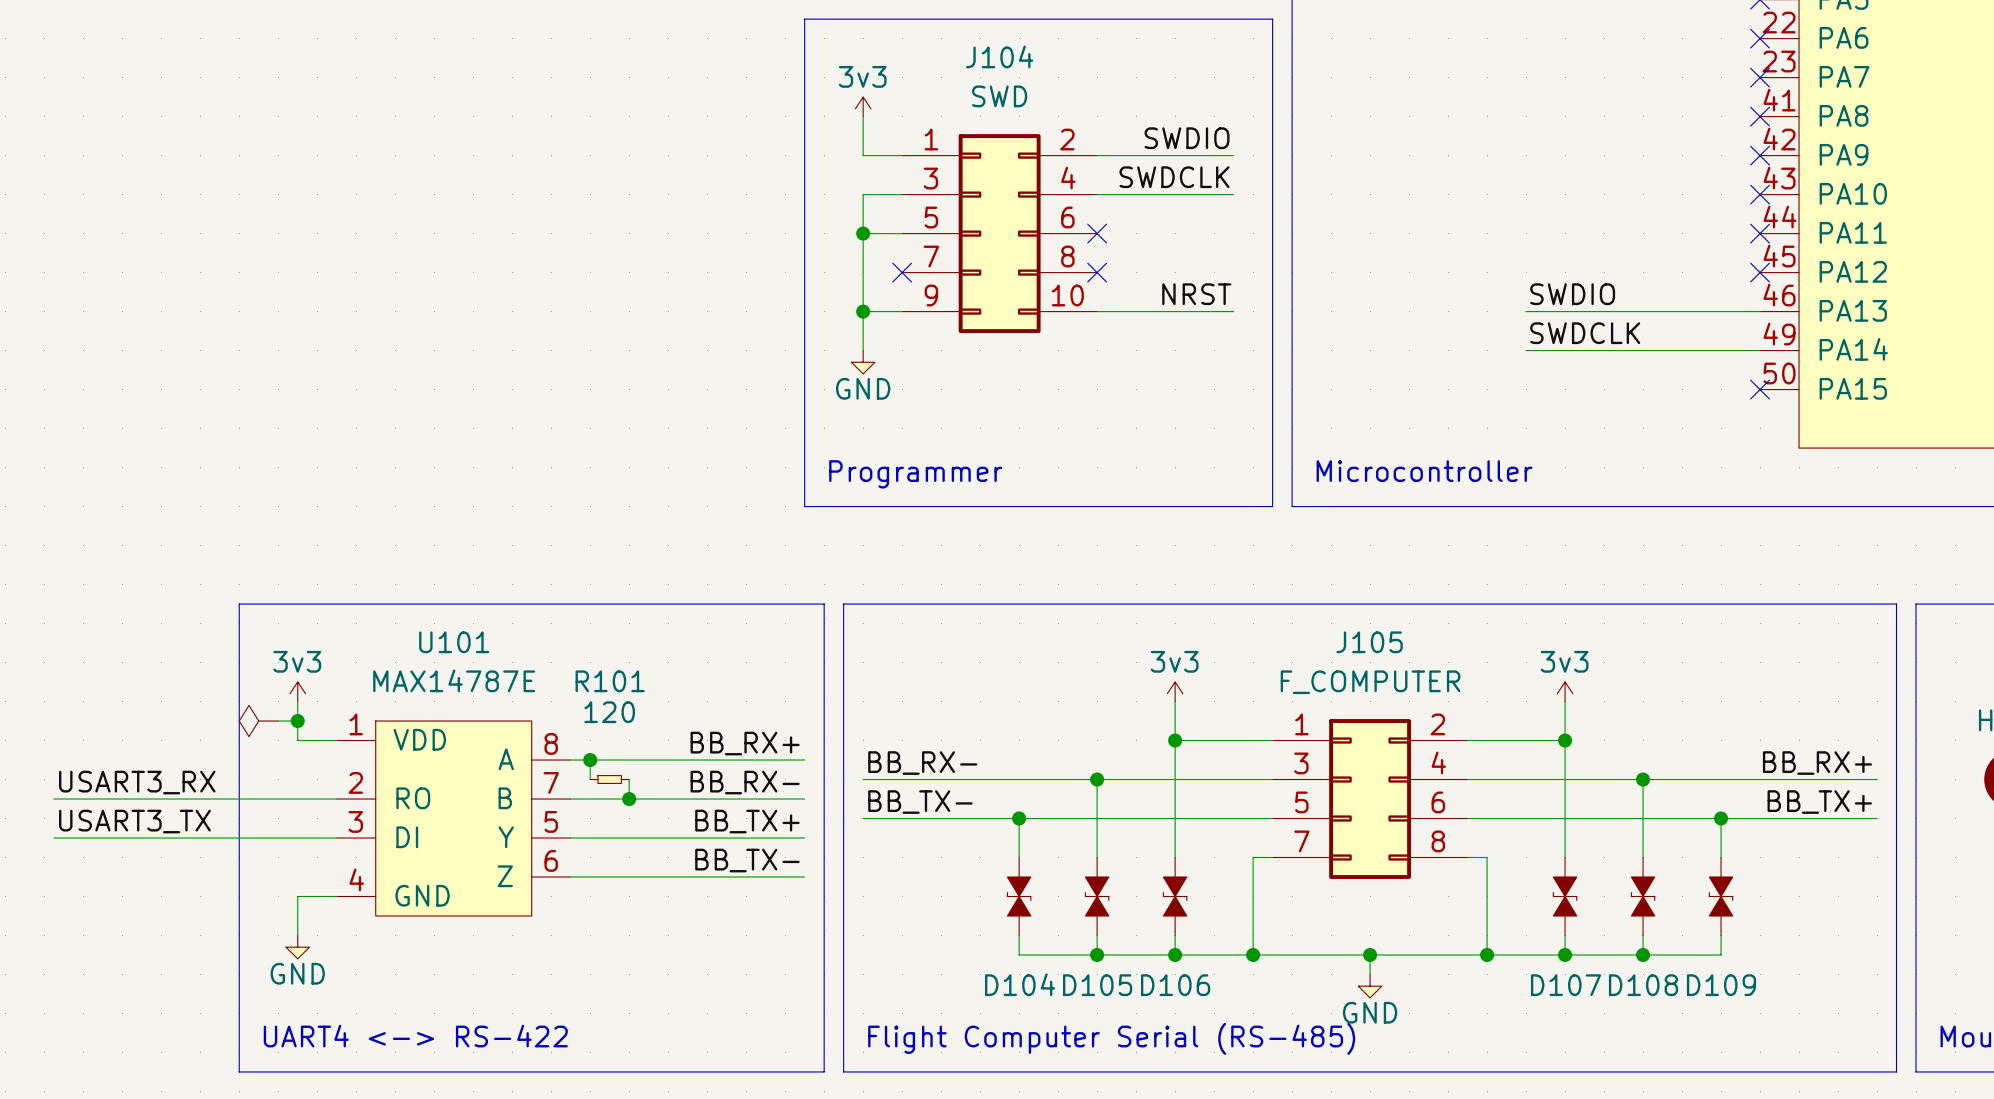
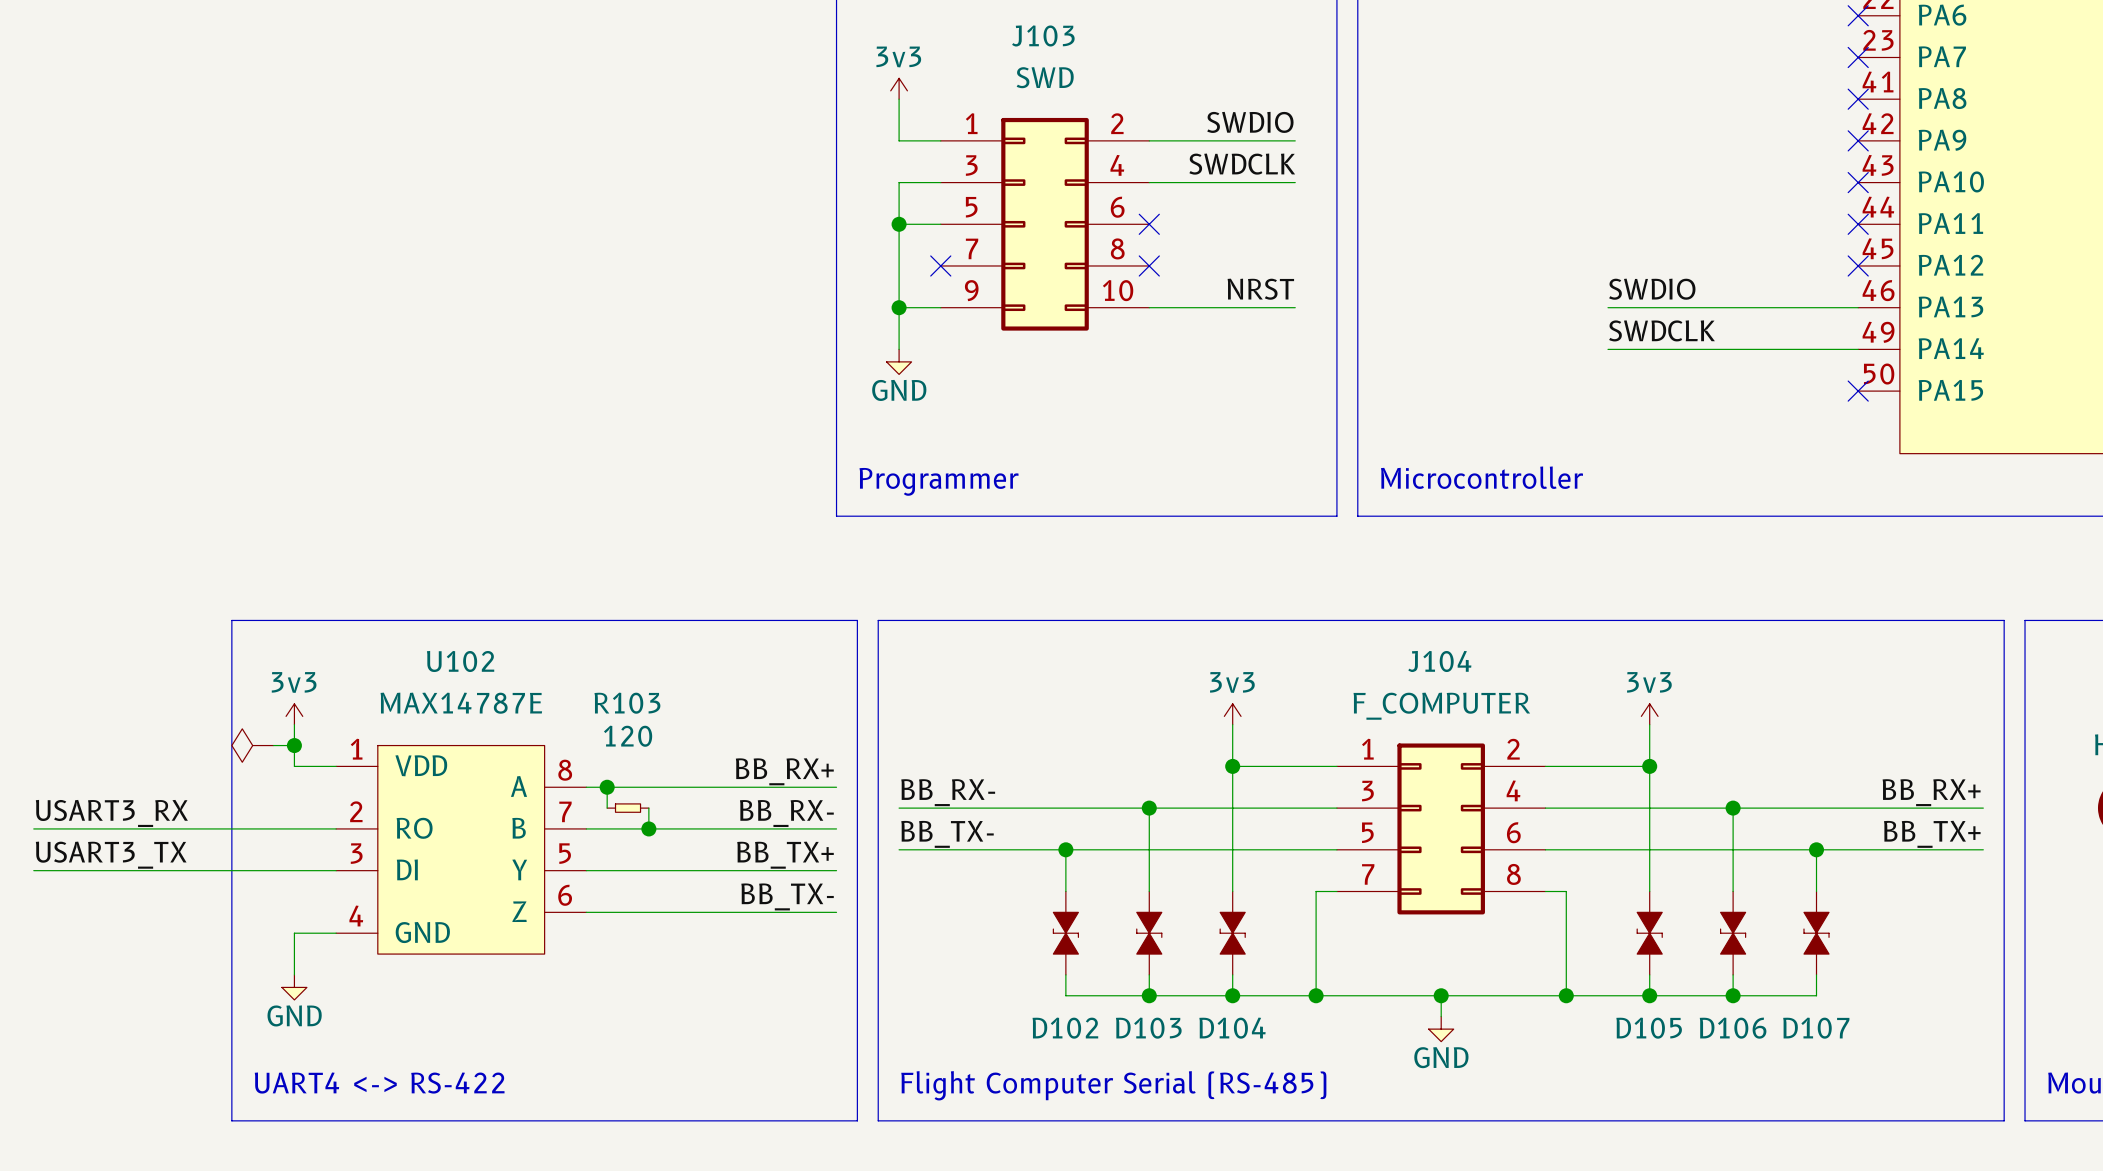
J104 name: J104 (999, 56) -> J103 (1043, 35)
U101 name: U101 (454, 642) -> U102 (460, 661)
J105 name: J105 (1369, 642) -> J104 (1439, 661)
R101 name: R101 (610, 681) -> R103 (627, 703)
D104 name: D104 (1020, 984) -> D102 (1065, 1028)
D105 name: D105 (1097, 985) -> D103 (1148, 1028)
D106 name: D106 (1175, 985) -> D104 (1232, 1028)
D107 name: D107 (1565, 985) -> D105 (1649, 1028)
D108 name: D108 (1643, 985) -> D106 (1733, 1028)
D109 name: D109 (1721, 985) -> D107 (1816, 1028)

